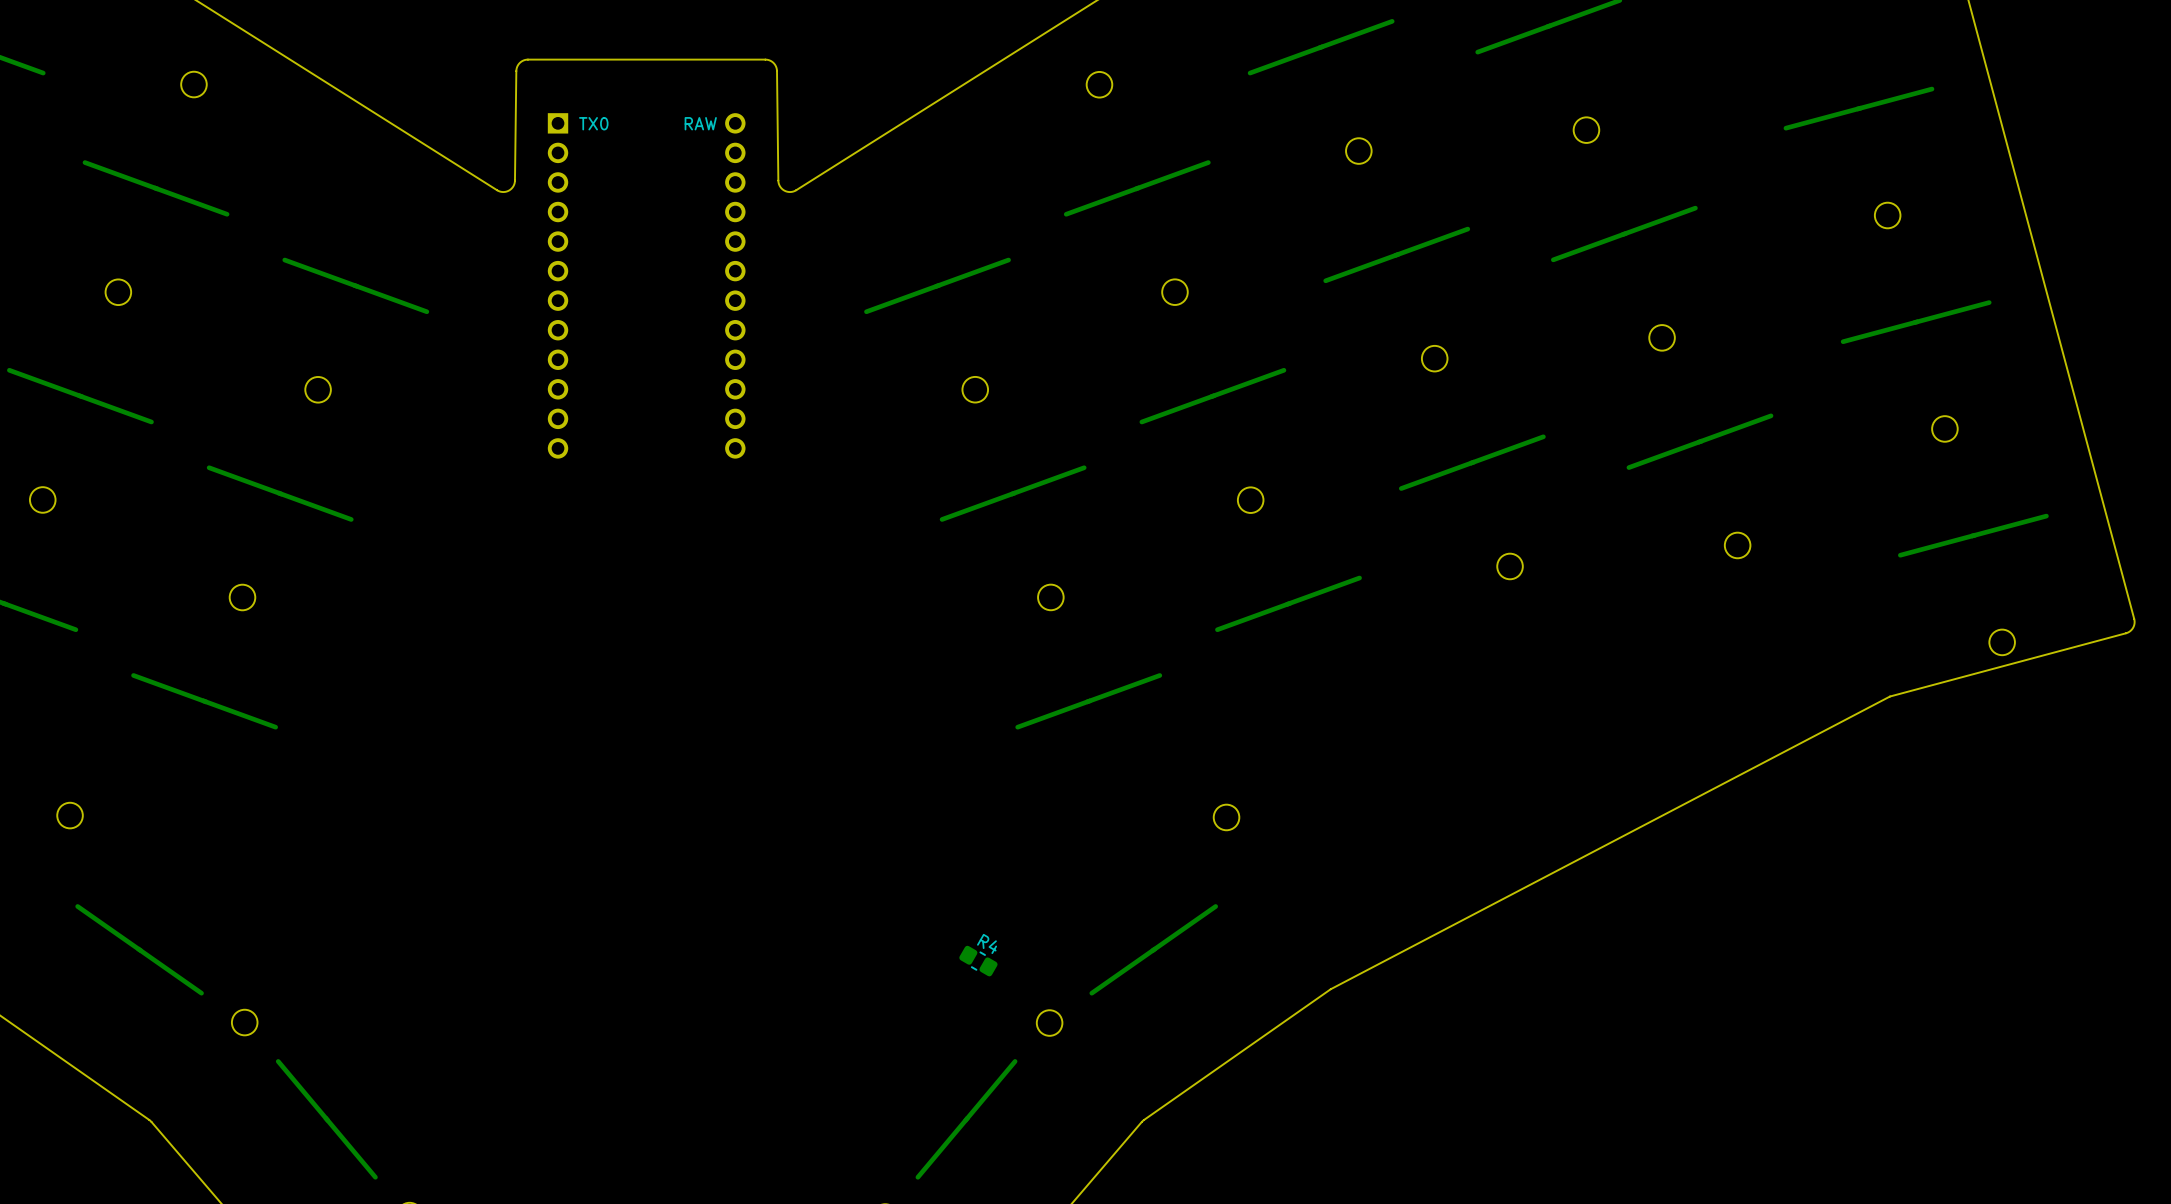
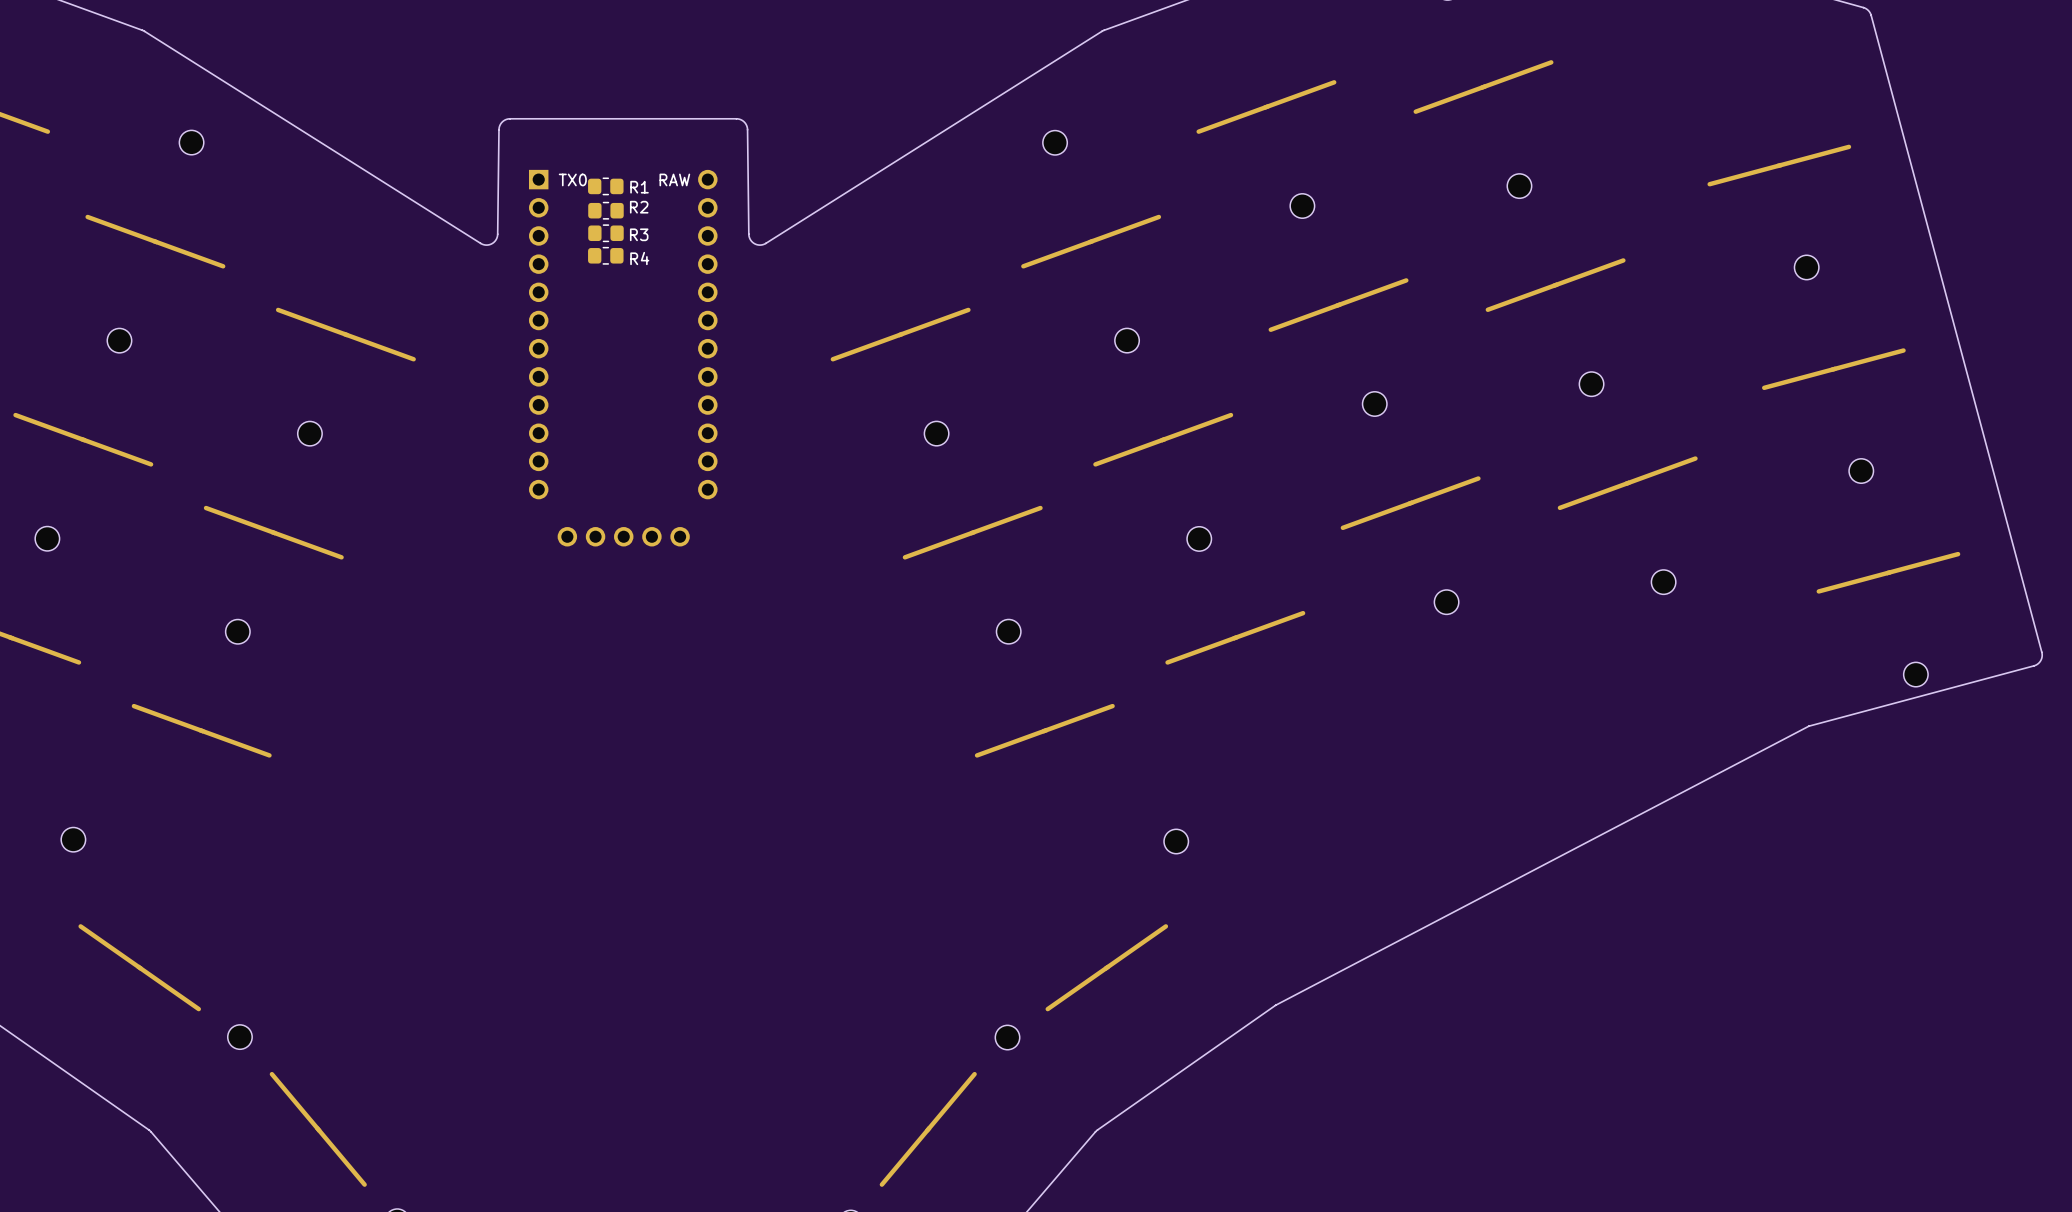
R1: none -> (605, 186)
R2: none -> (605, 210)
R3: none -> (605, 233)
part: none -> (623, 536)
R4 name position: R4 (987, 943) -> R4 (639, 258)
R4 rotation: 0° (978, 961) -> 30° counterclockwise (605, 255)
R4 position: (978, 961) -> (605, 255)

